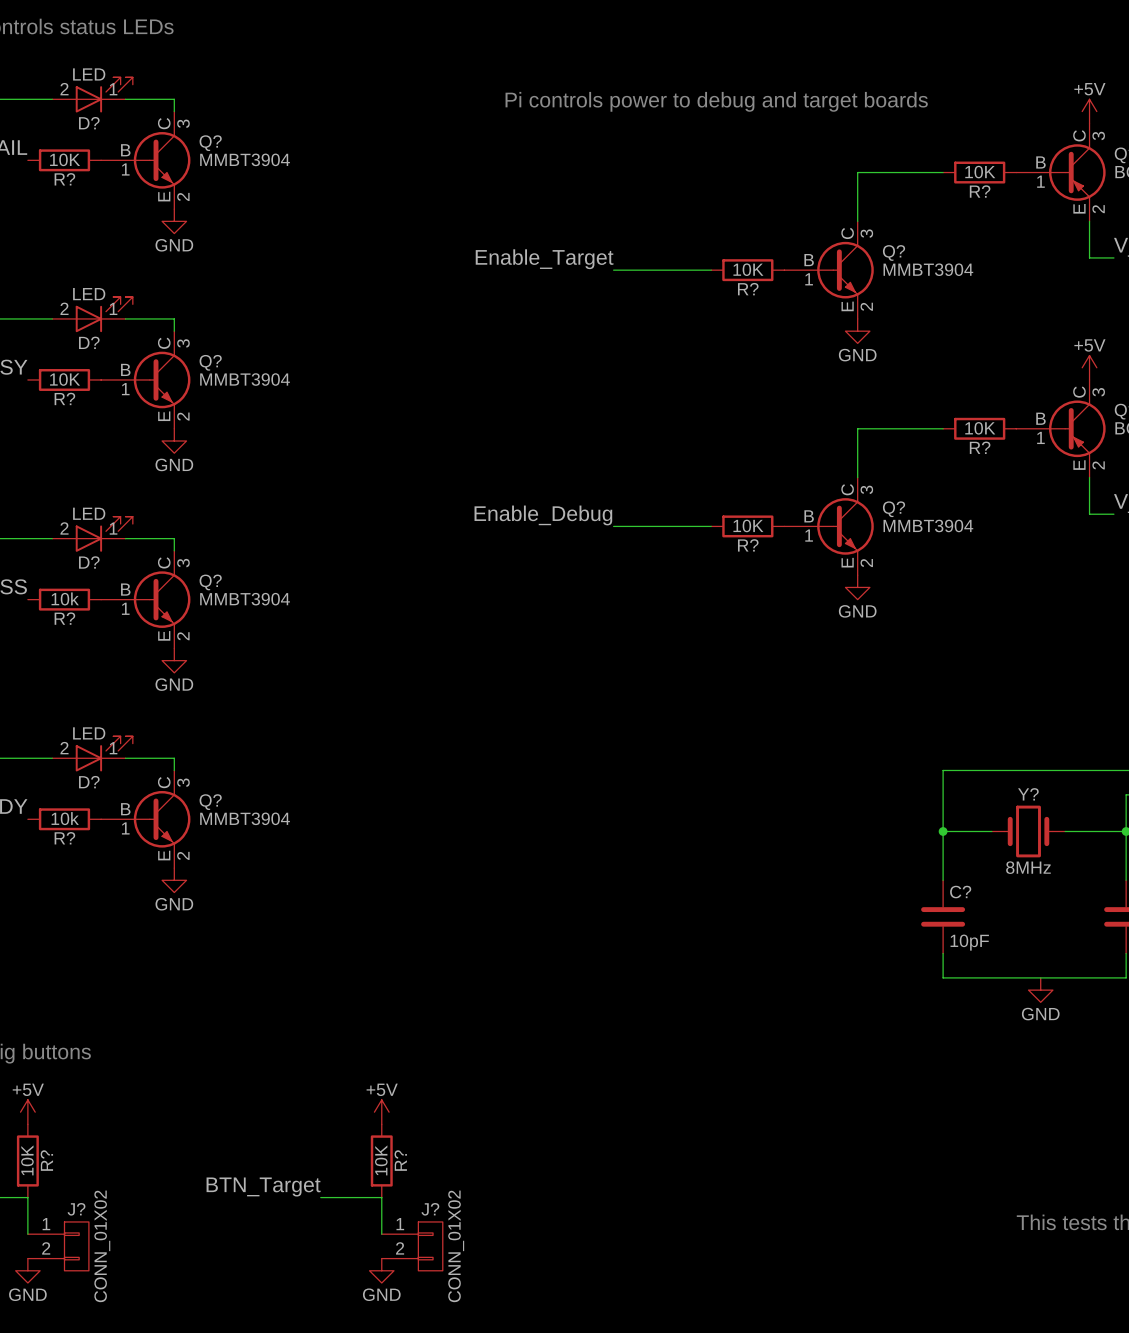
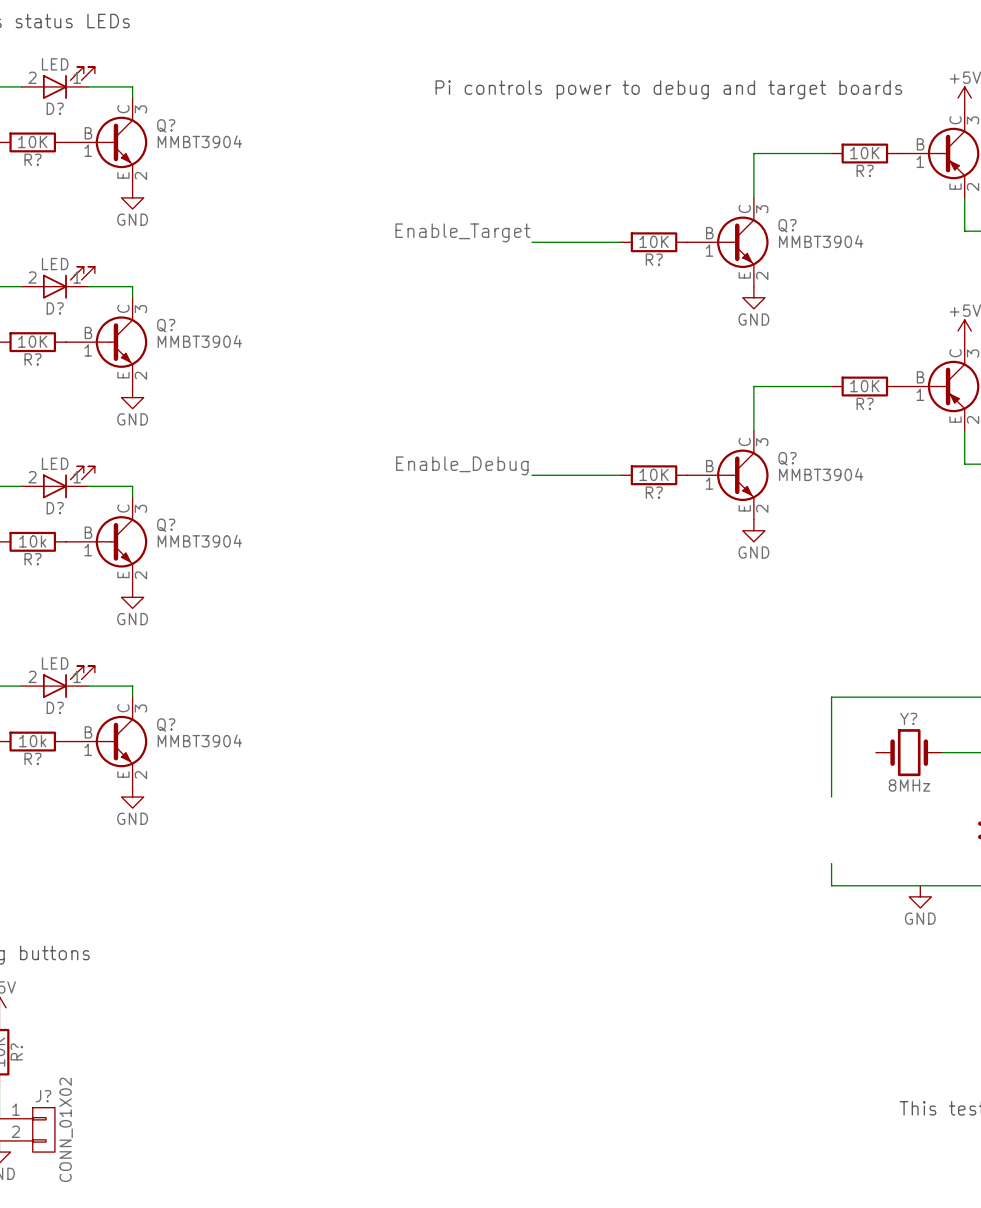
wire: (943, 831) (991, 831) -> none
junction: (943, 831) -> none
C?: 10pF (943, 916) -> none
power symbol: +5V (381, 1112) -> none
R?: 10K (381, 1160) -> none
label: BTN_Target (263, 1187) -> none
wire: (320, 1197) (381, 1197) (381, 1234) -> none
J?: CONN_01X02 (412, 1246) -> none
power symbol: GND (381, 1270) -> none

